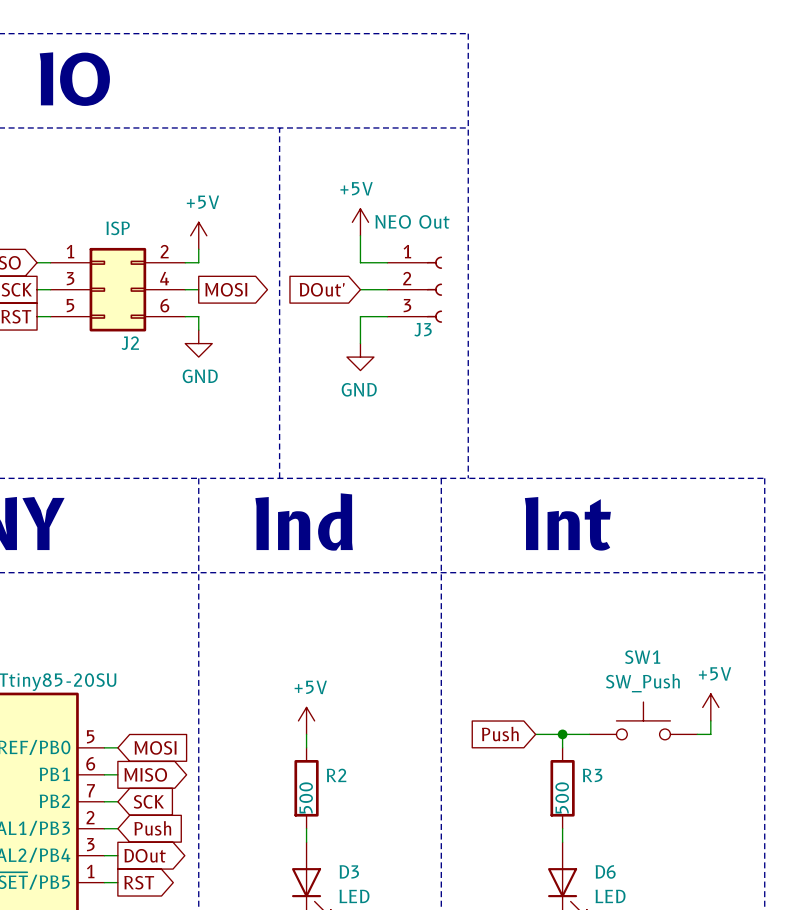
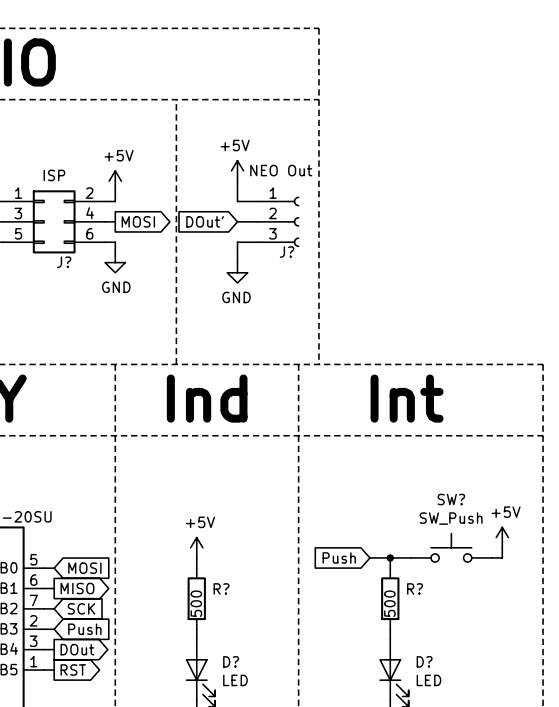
J3 name: J3 (423, 329) -> J? (287, 252)
J2 name: J2 (130, 343) -> J? (64, 262)
SW1 name: SW1 (642, 657) -> SW? (451, 499)
R2 name: R2 (336, 775) -> R? (221, 588)
R3 name: R3 (592, 775) -> R? (415, 588)
D3 name: D3 (349, 871) -> D? (231, 661)
D6 name: D6 (605, 871) -> D? (424, 661)

